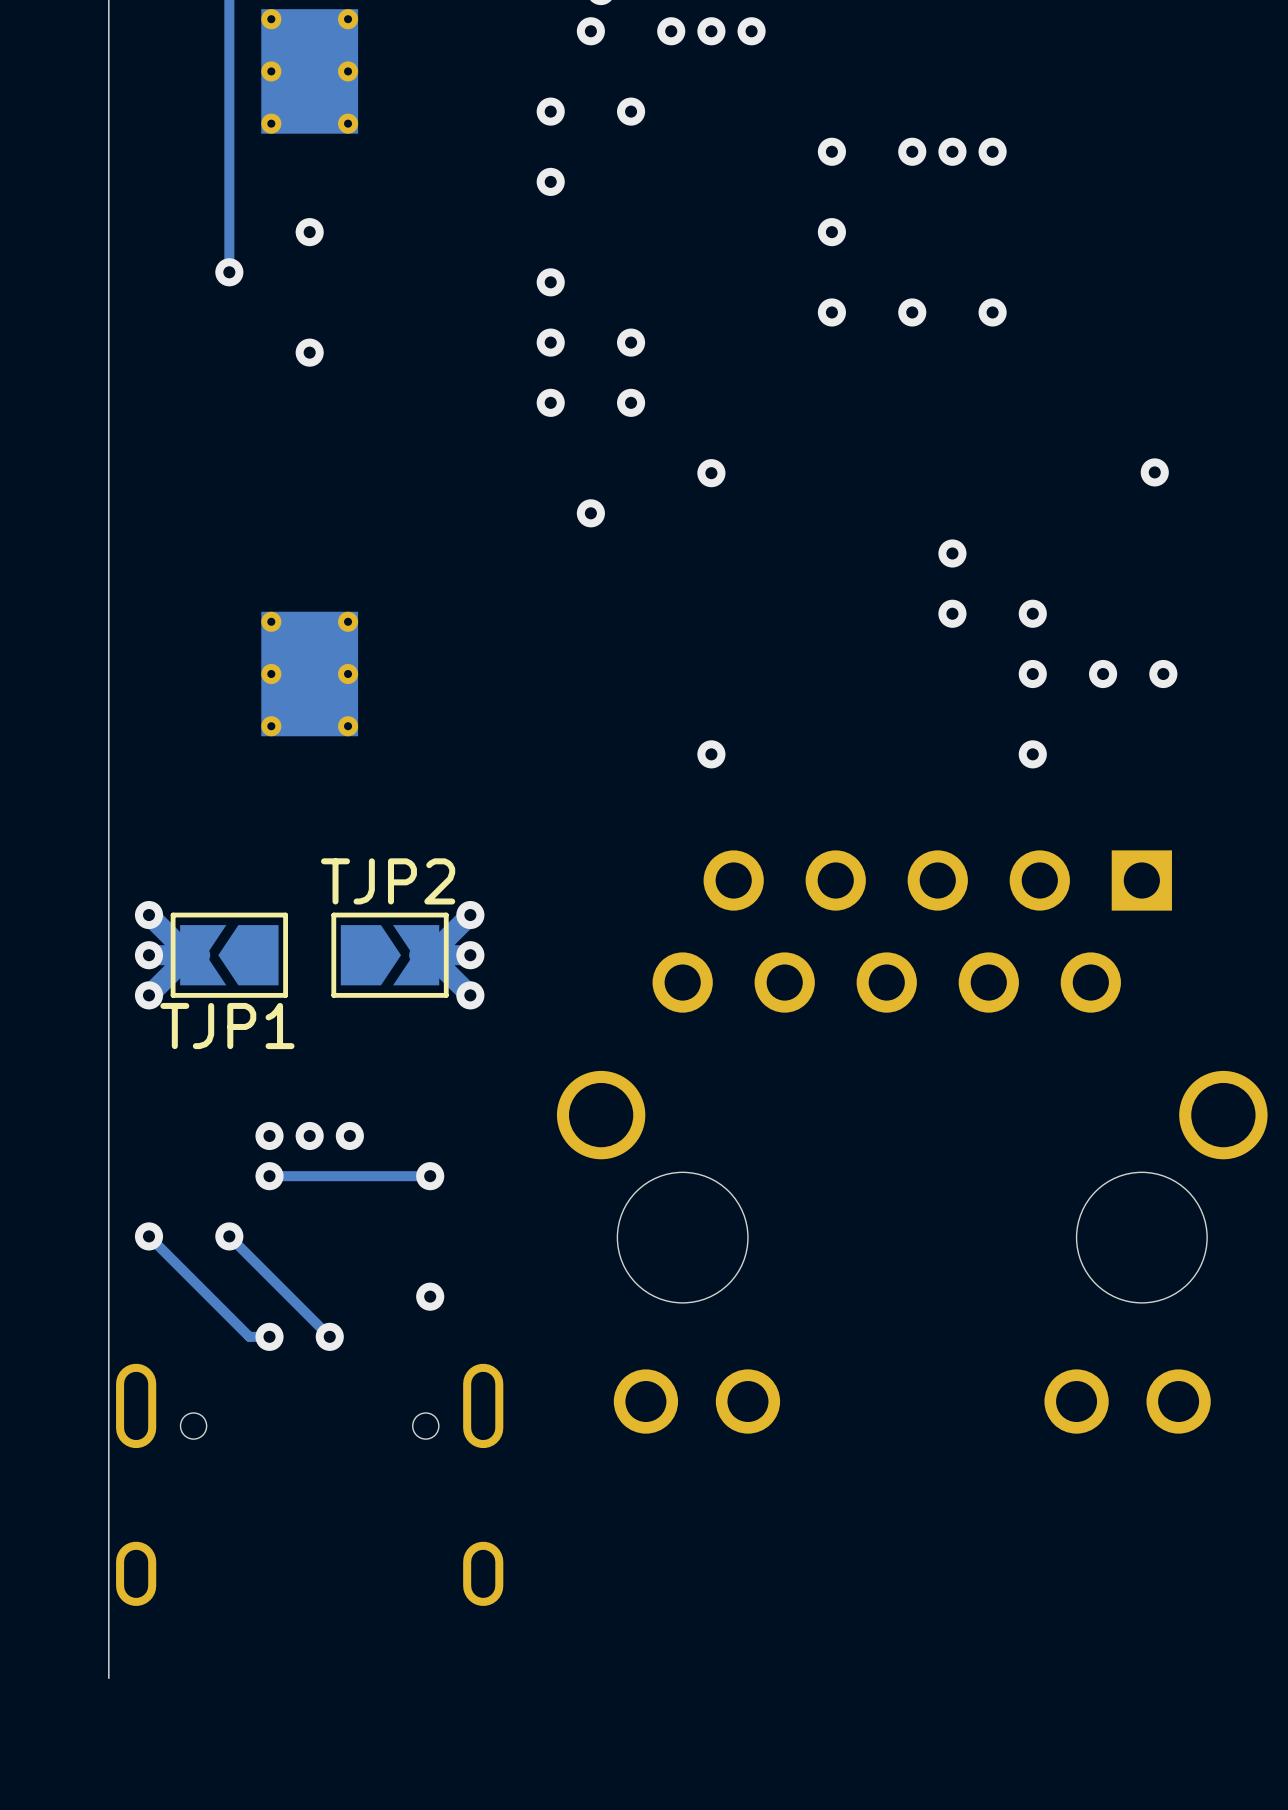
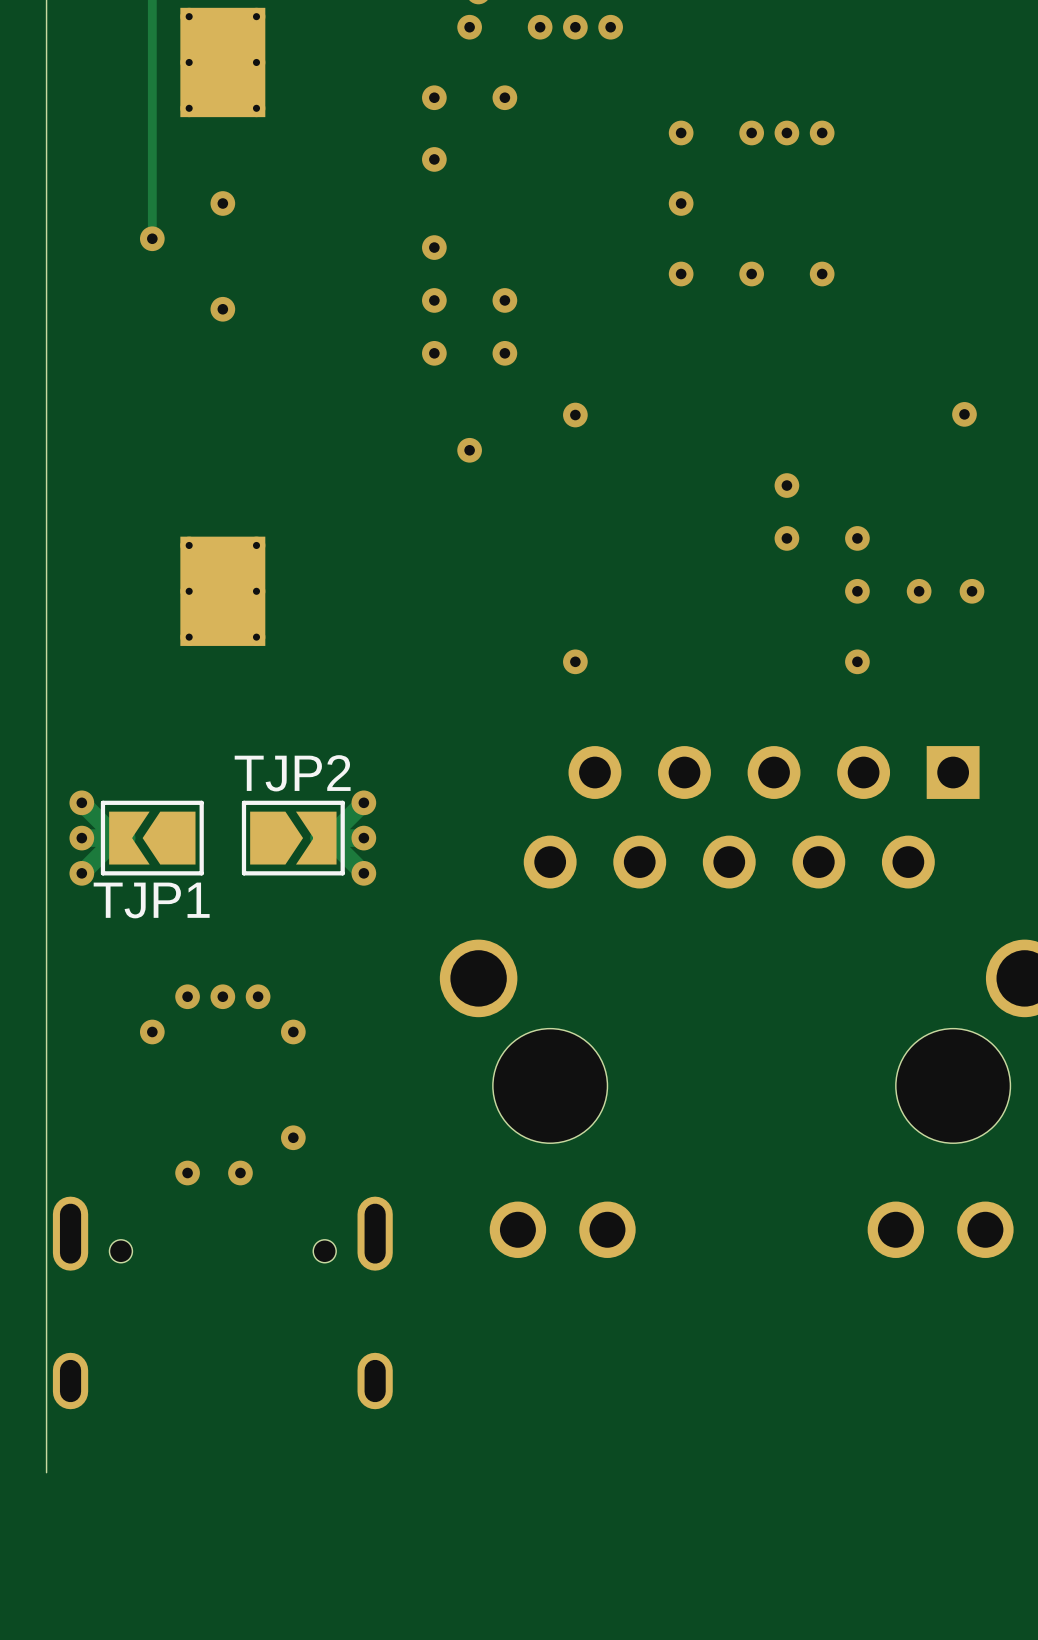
via: none -> (152, 1031)
via: (269, 1176) -> none
track: (430, 1176) (269, 1176) -> none
via position: (430, 1176) -> (293, 1031)
track: (149, 1236) (249, 1336) (269, 1336) -> none
via: (149, 1236) -> none
track: (229, 1236) (329, 1336) -> none
via: (229, 1236) -> none
via position: (430, 1296) -> (293, 1137)

